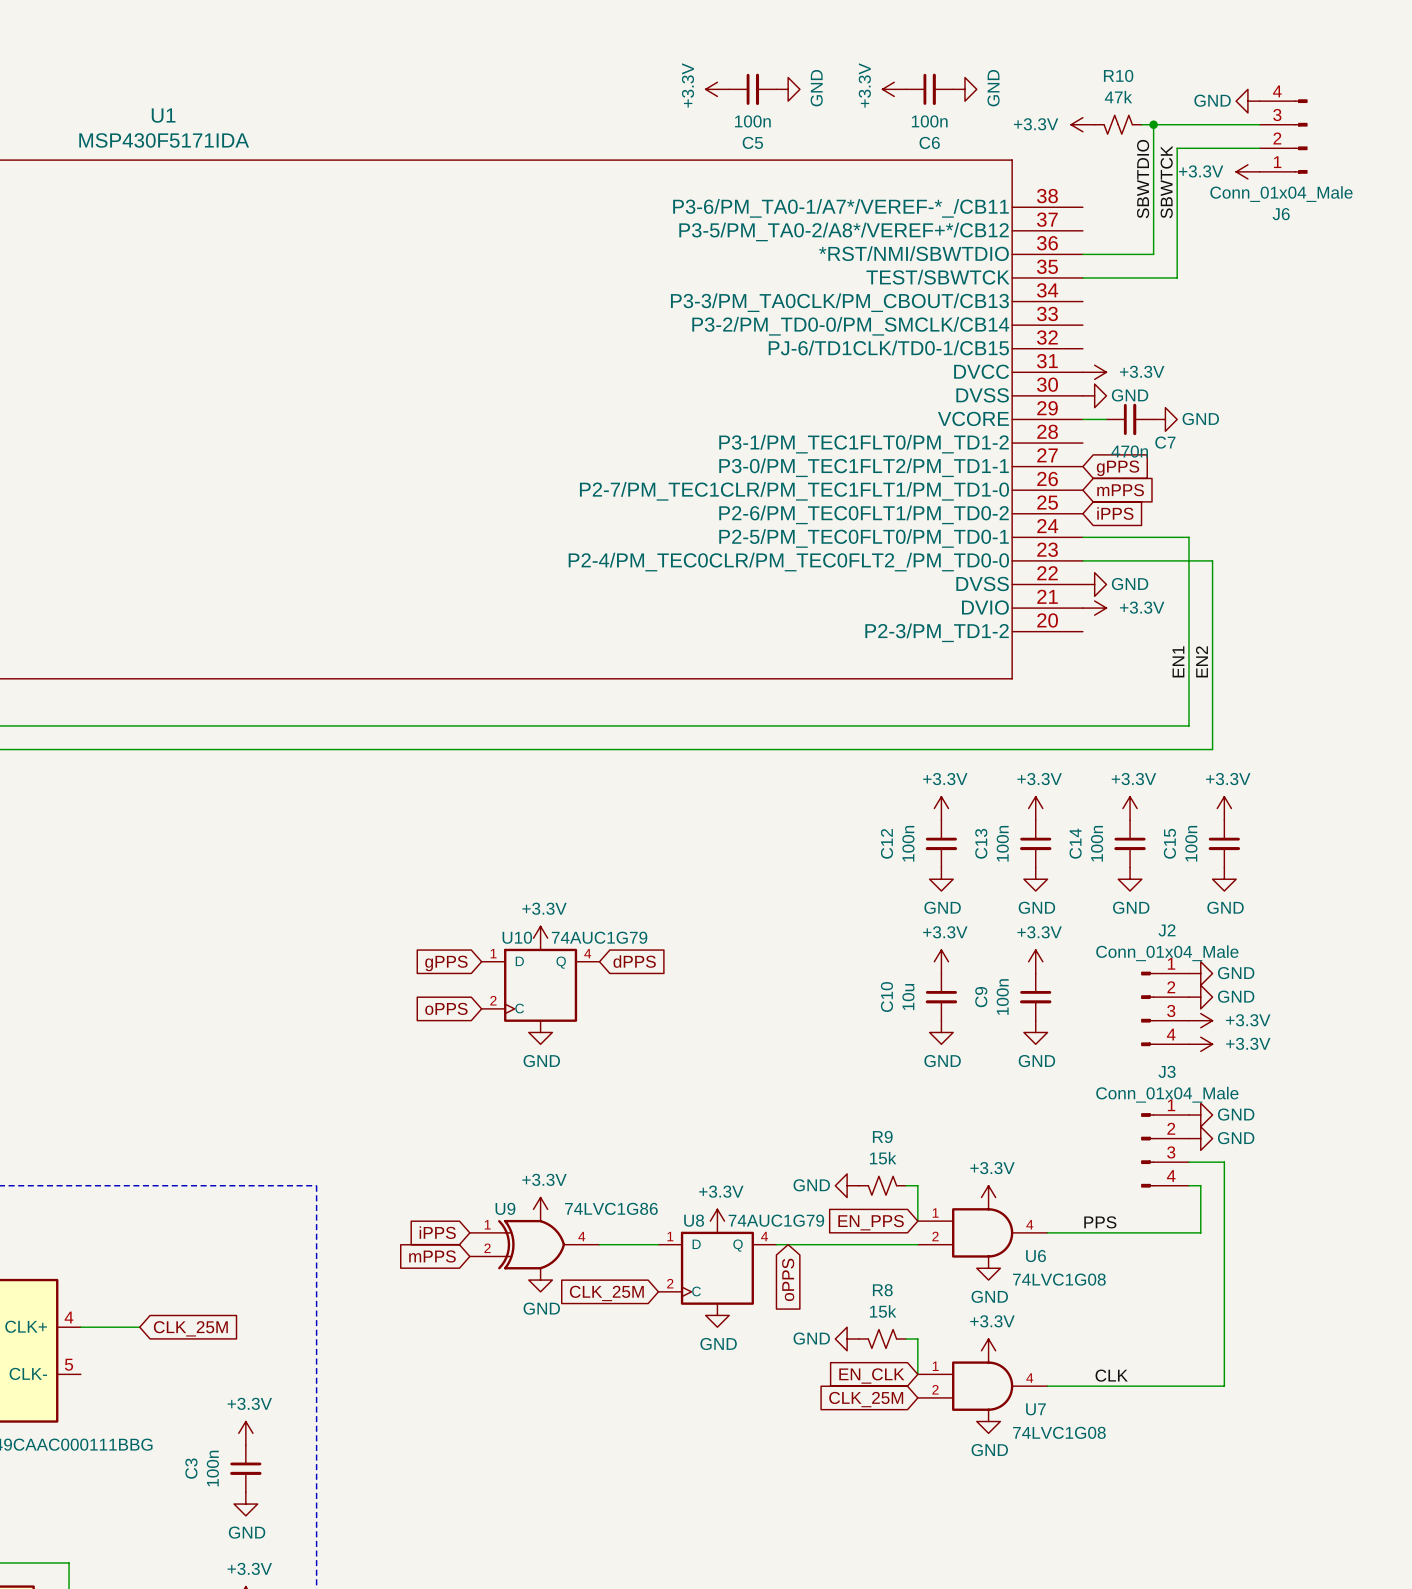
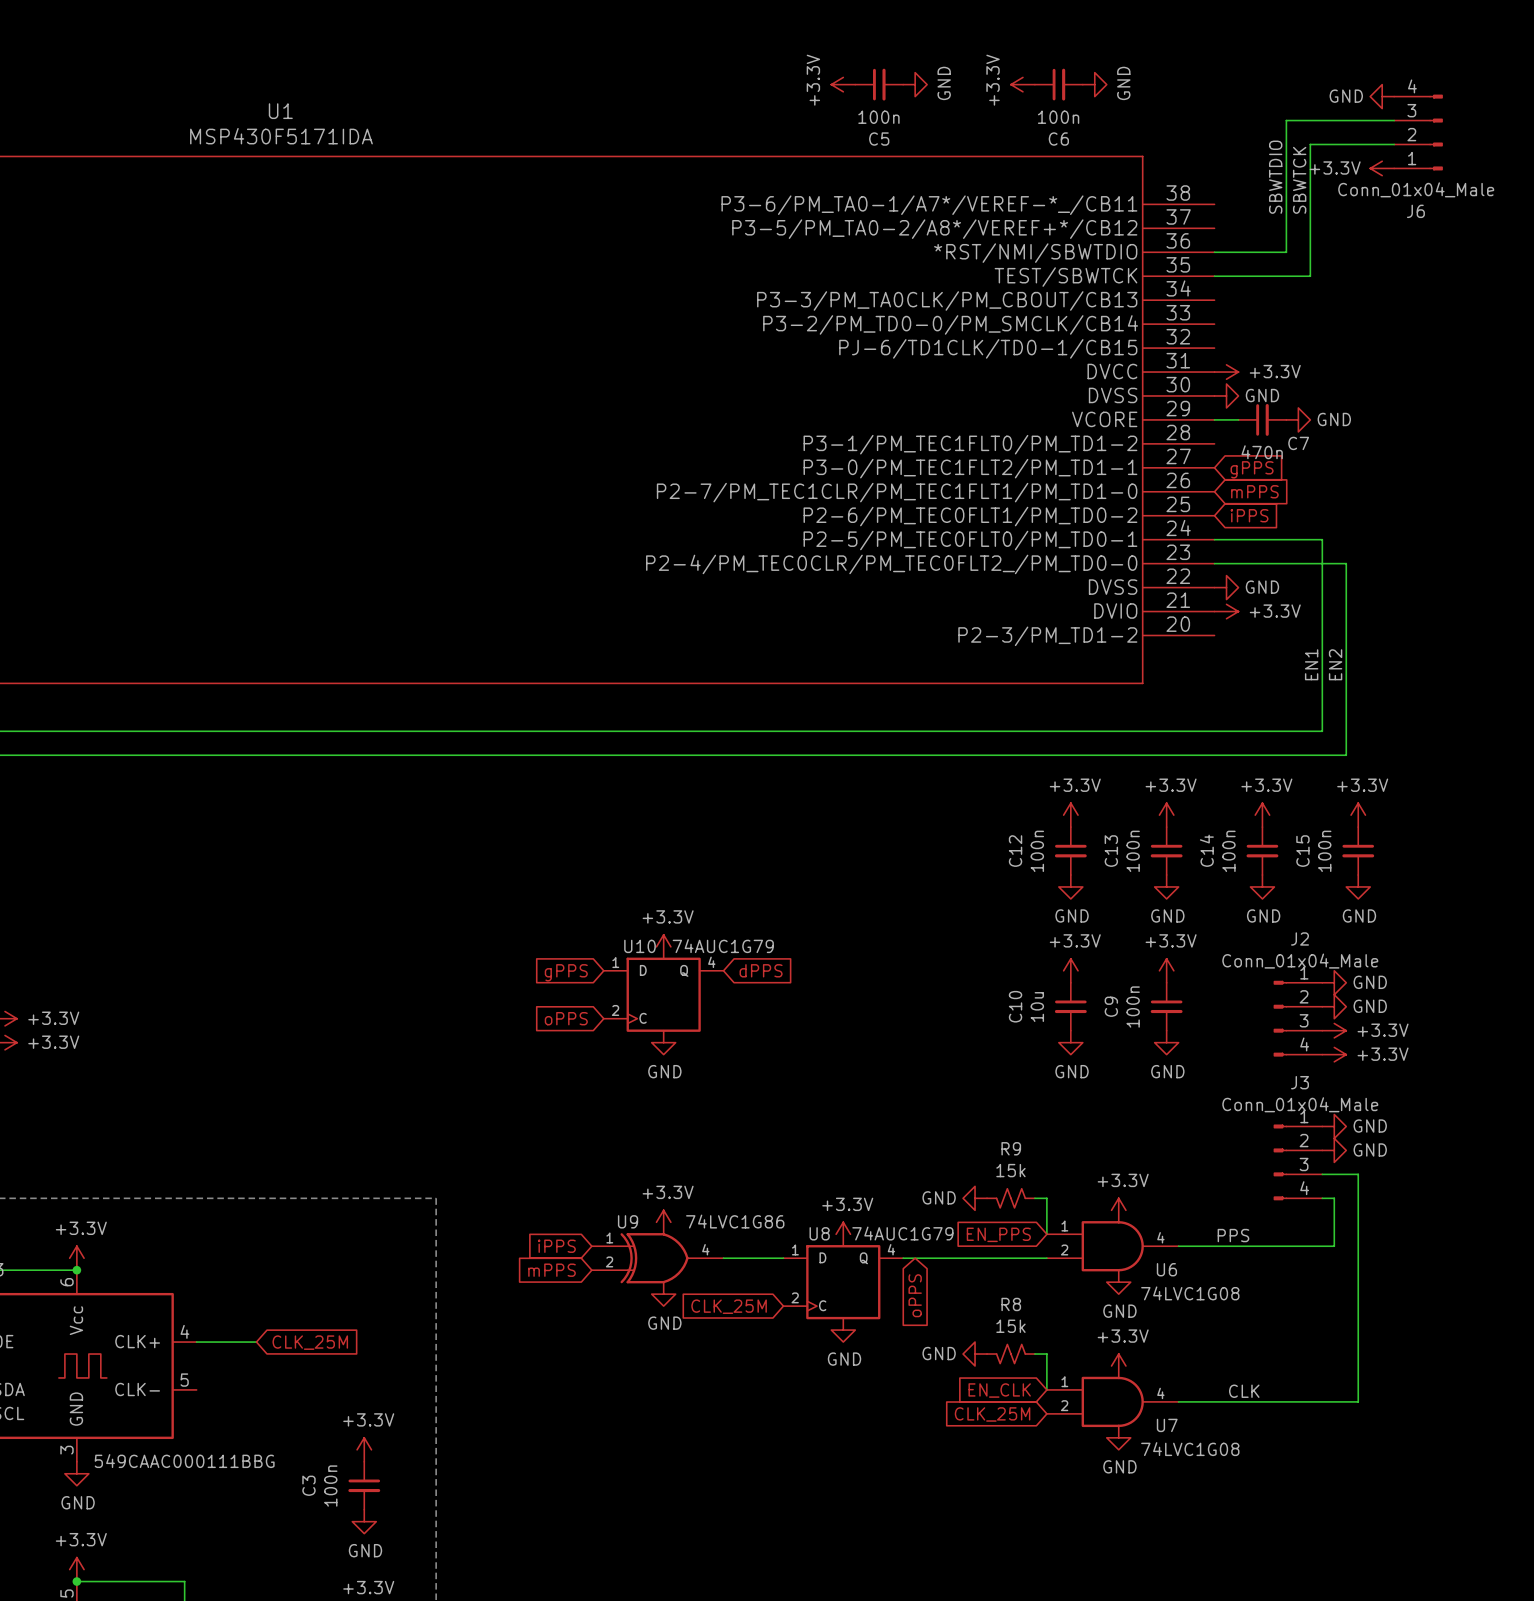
power symbol: +3.3V (1082, 124) -> none
R10: 47k (1118, 124) -> none
wire: (1141, 124) (1153, 124) -> none
junction: (1153, 124) -> none

